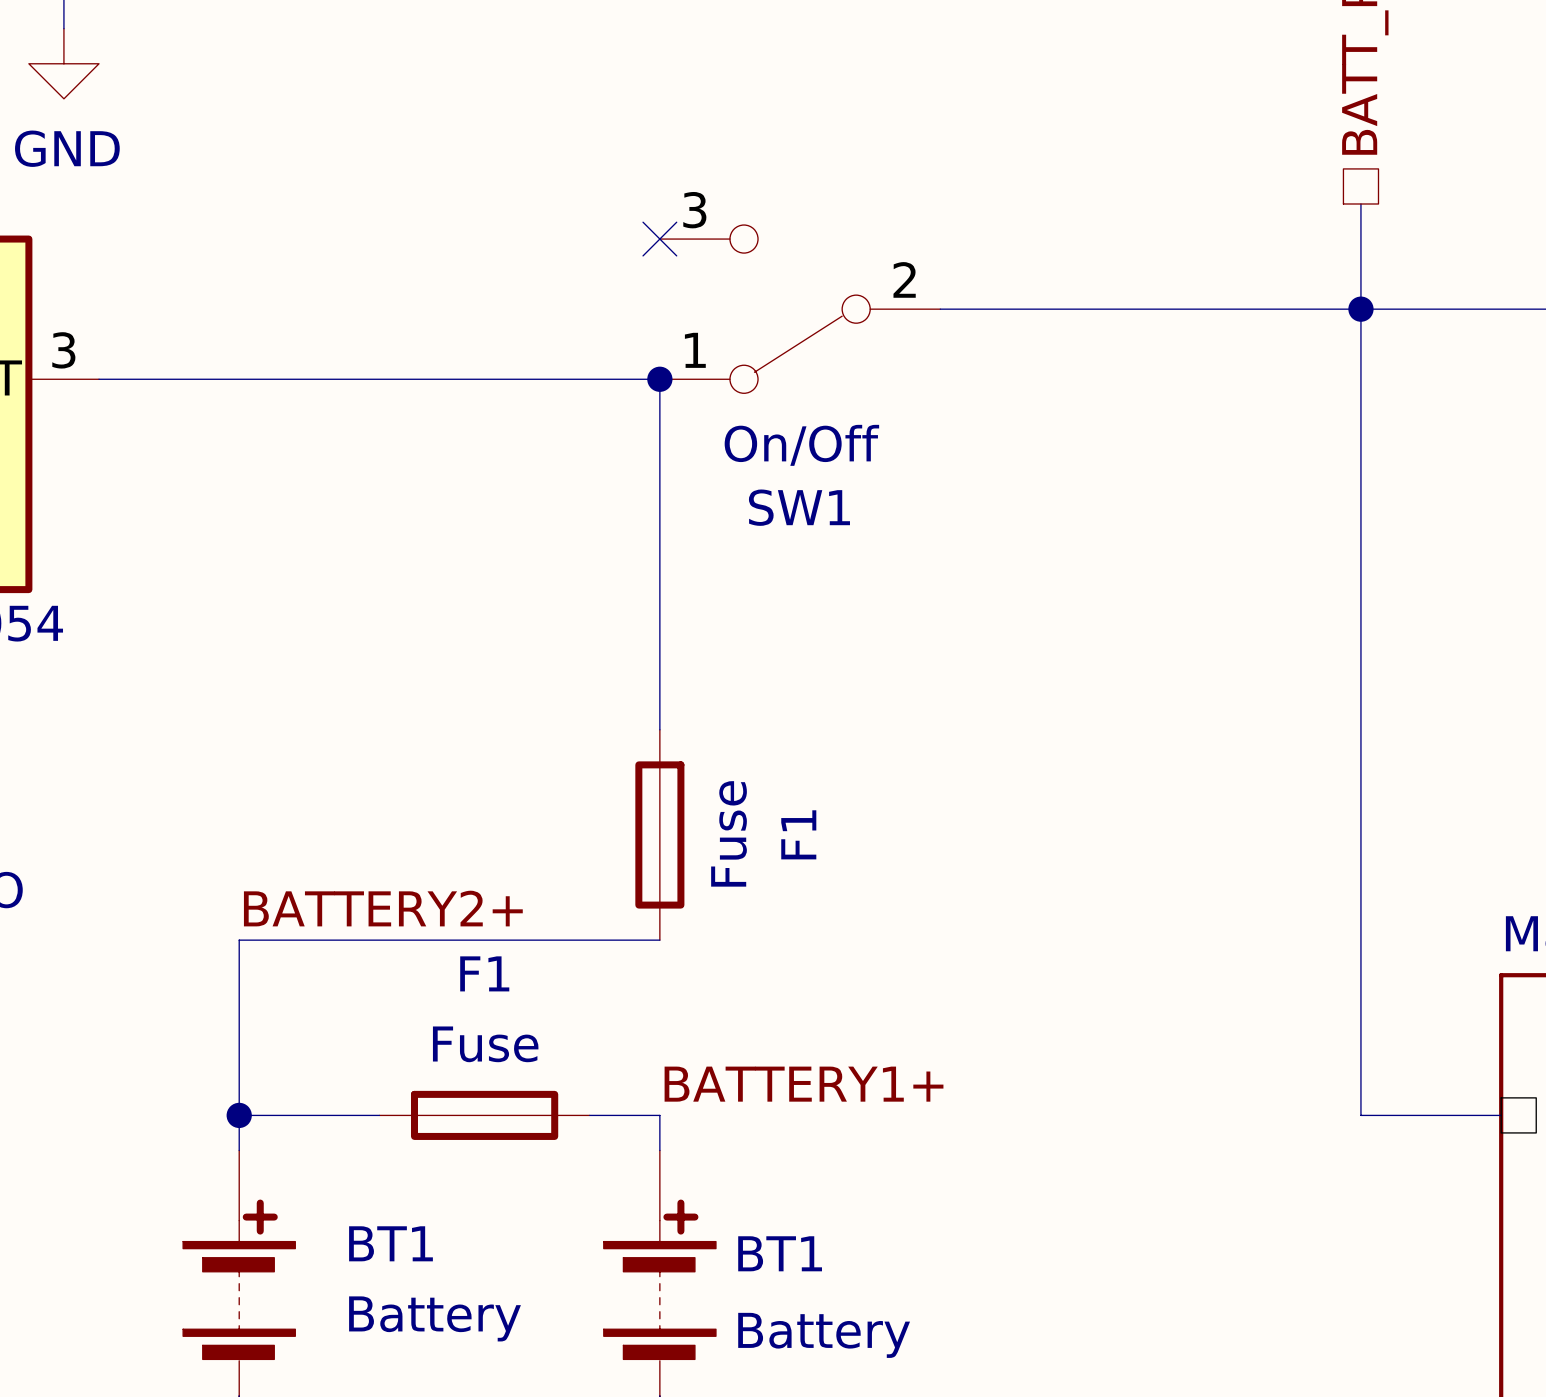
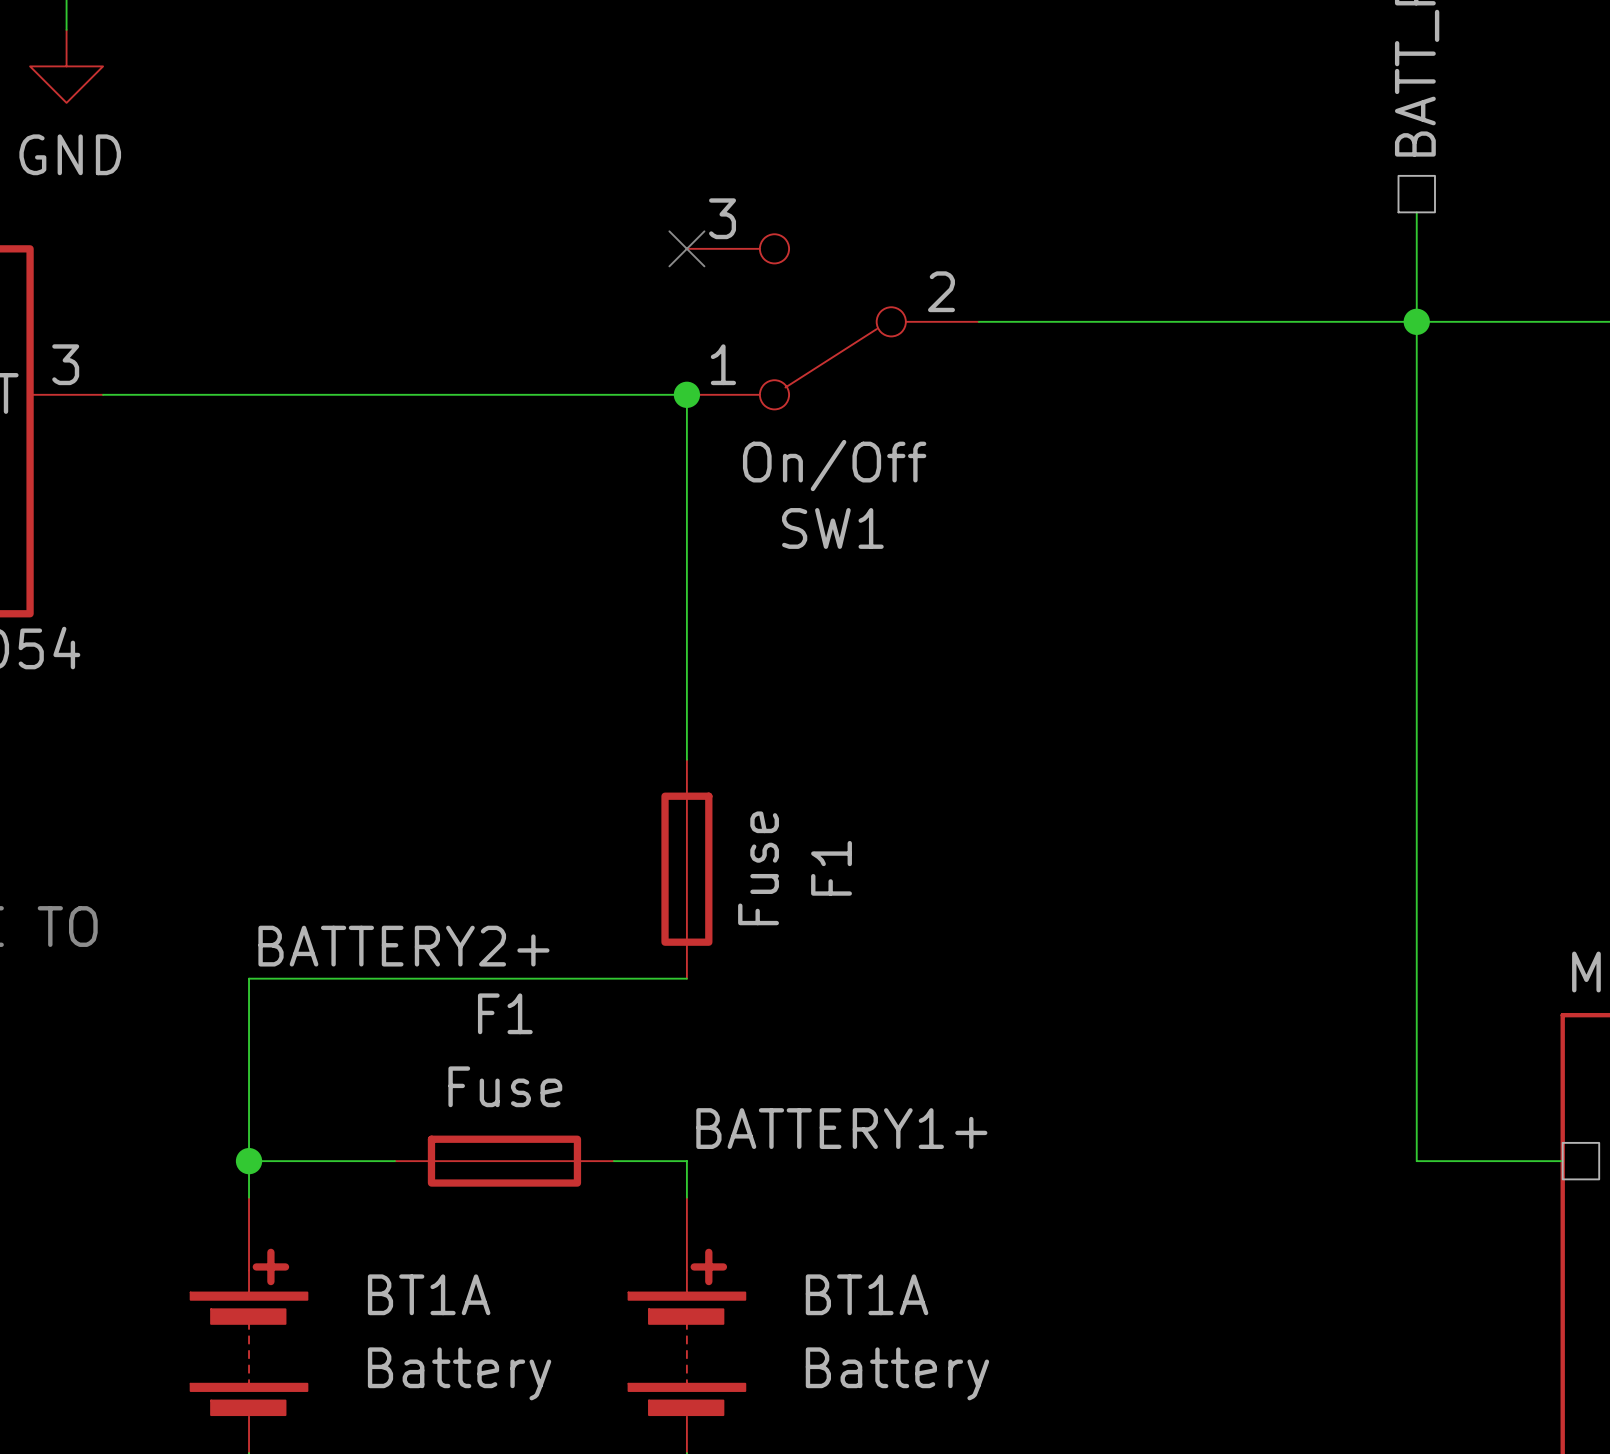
BT1 name: BT1 (390, 1243) -> BT1A (429, 1294)
BT1 name: BT1 (780, 1253) -> BT1A (867, 1294)
BT1 value position: Battery (824, 1335) -> Battery (897, 1373)

